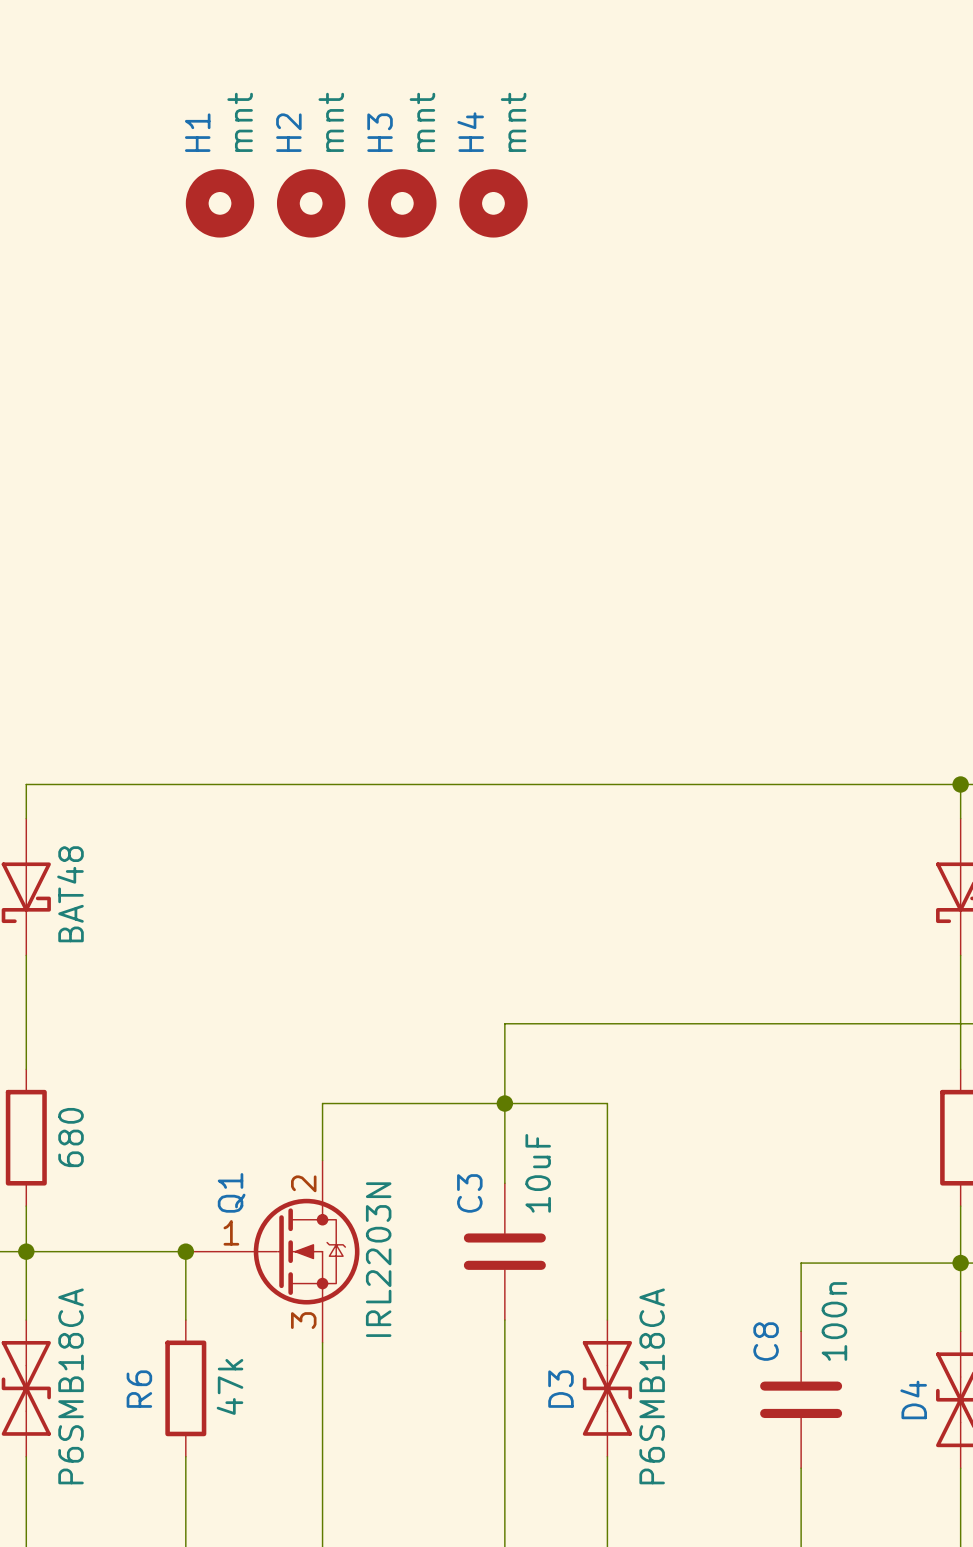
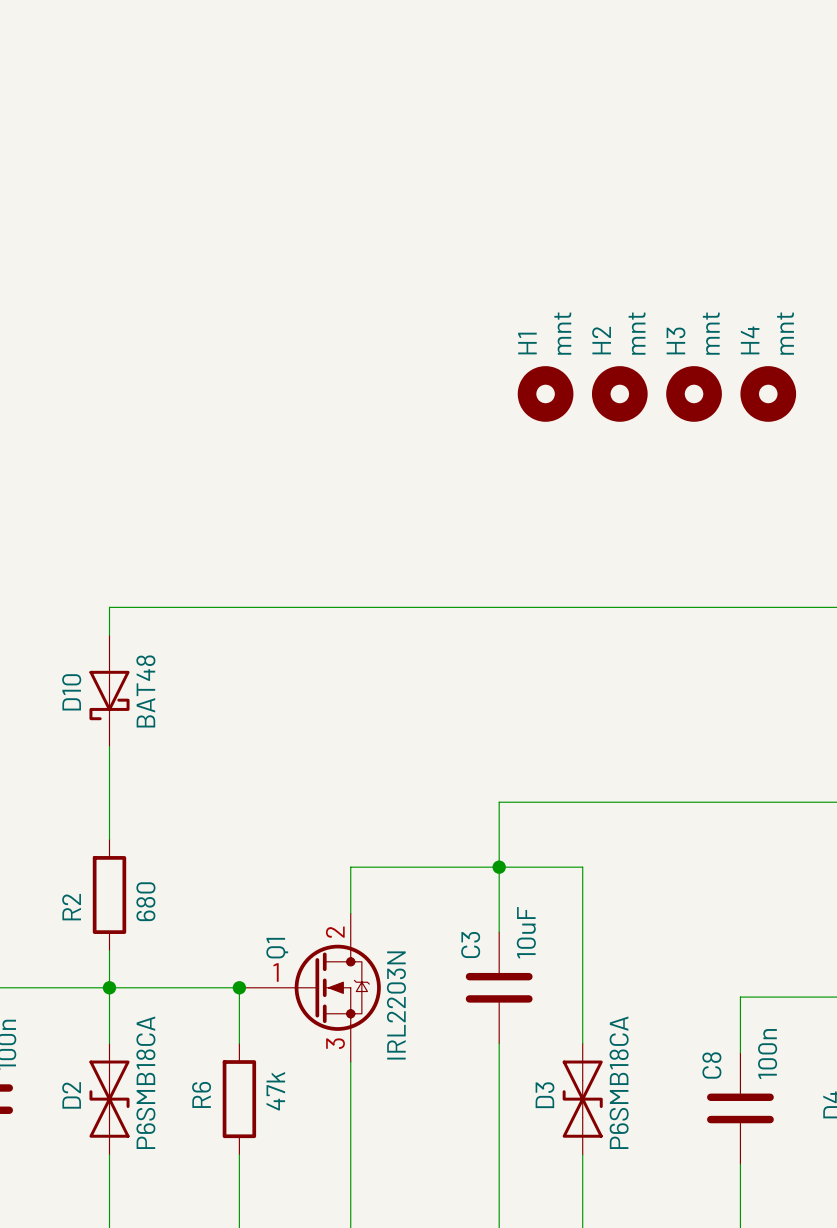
H1 position: (220, 203) -> (545, 393)
H2 position: (311, 203) -> (619, 393)
H3 position: (402, 203) -> (694, 393)
H4 position: (493, 203) -> (768, 393)

